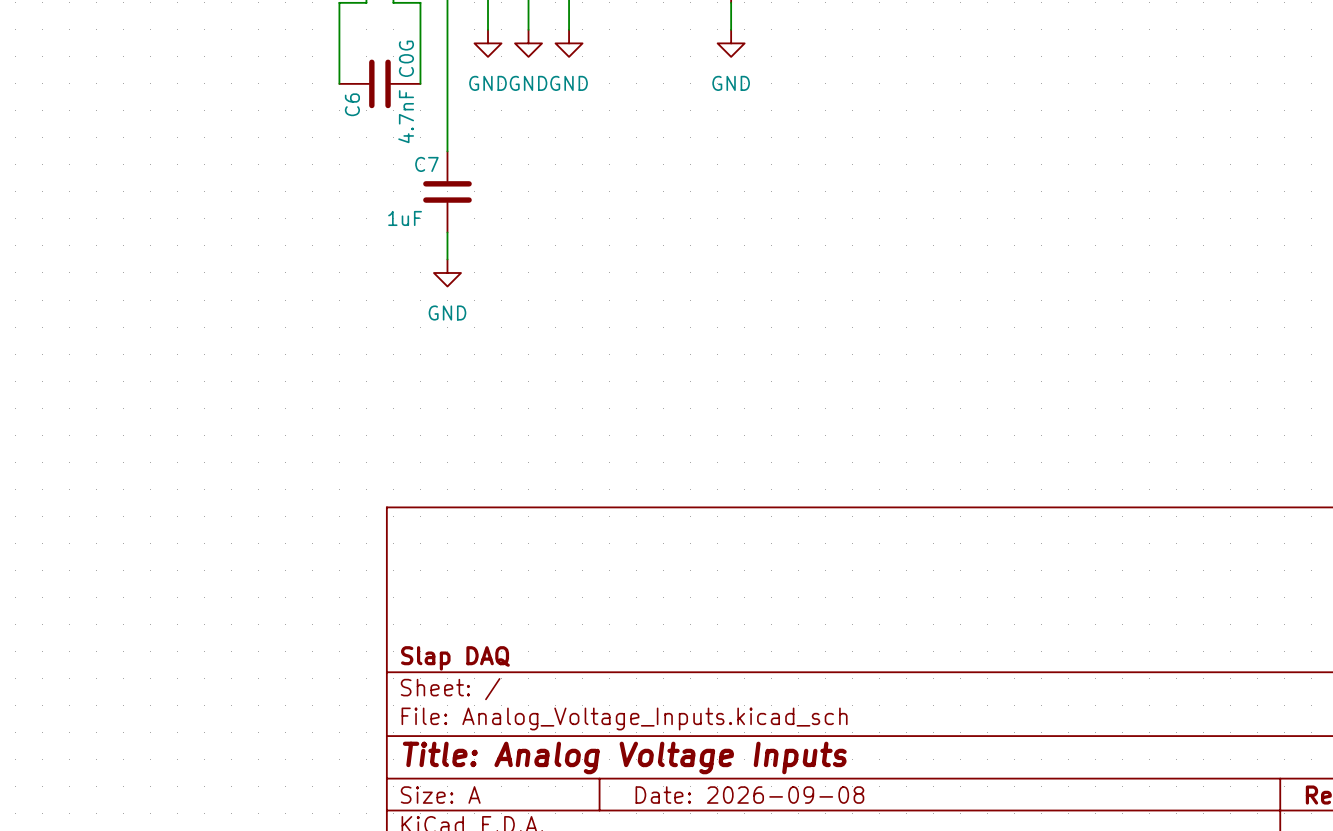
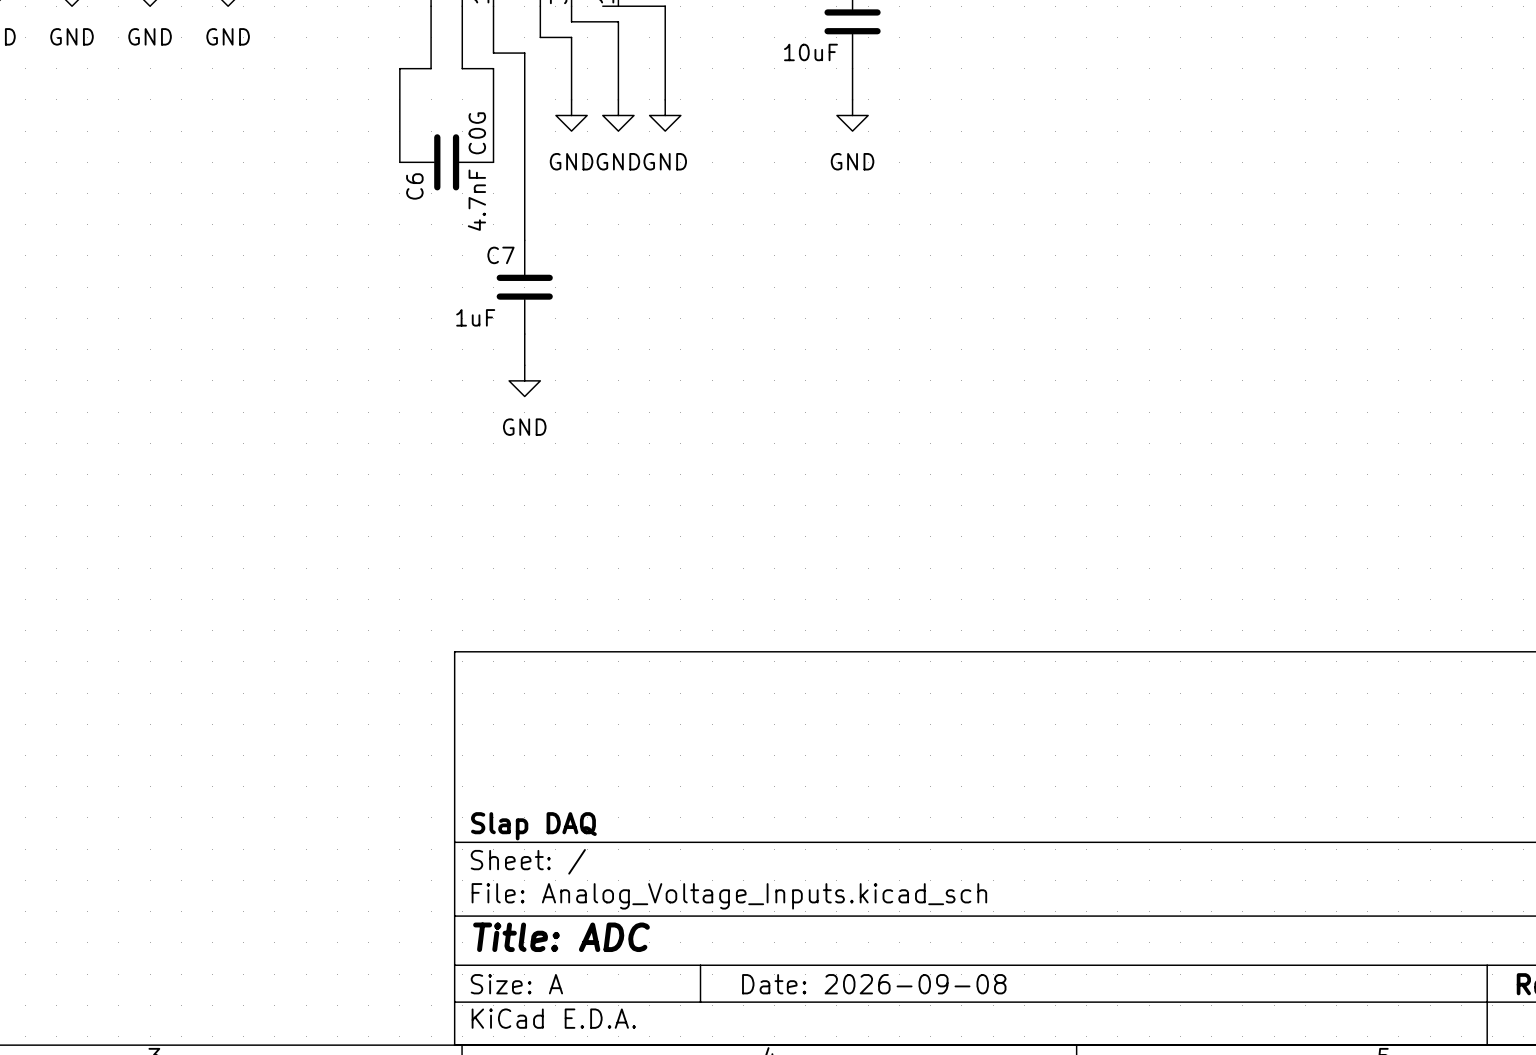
title block: Title: Analog Voltage Inputs (624, 757) -> Title: ADC (561, 937)

